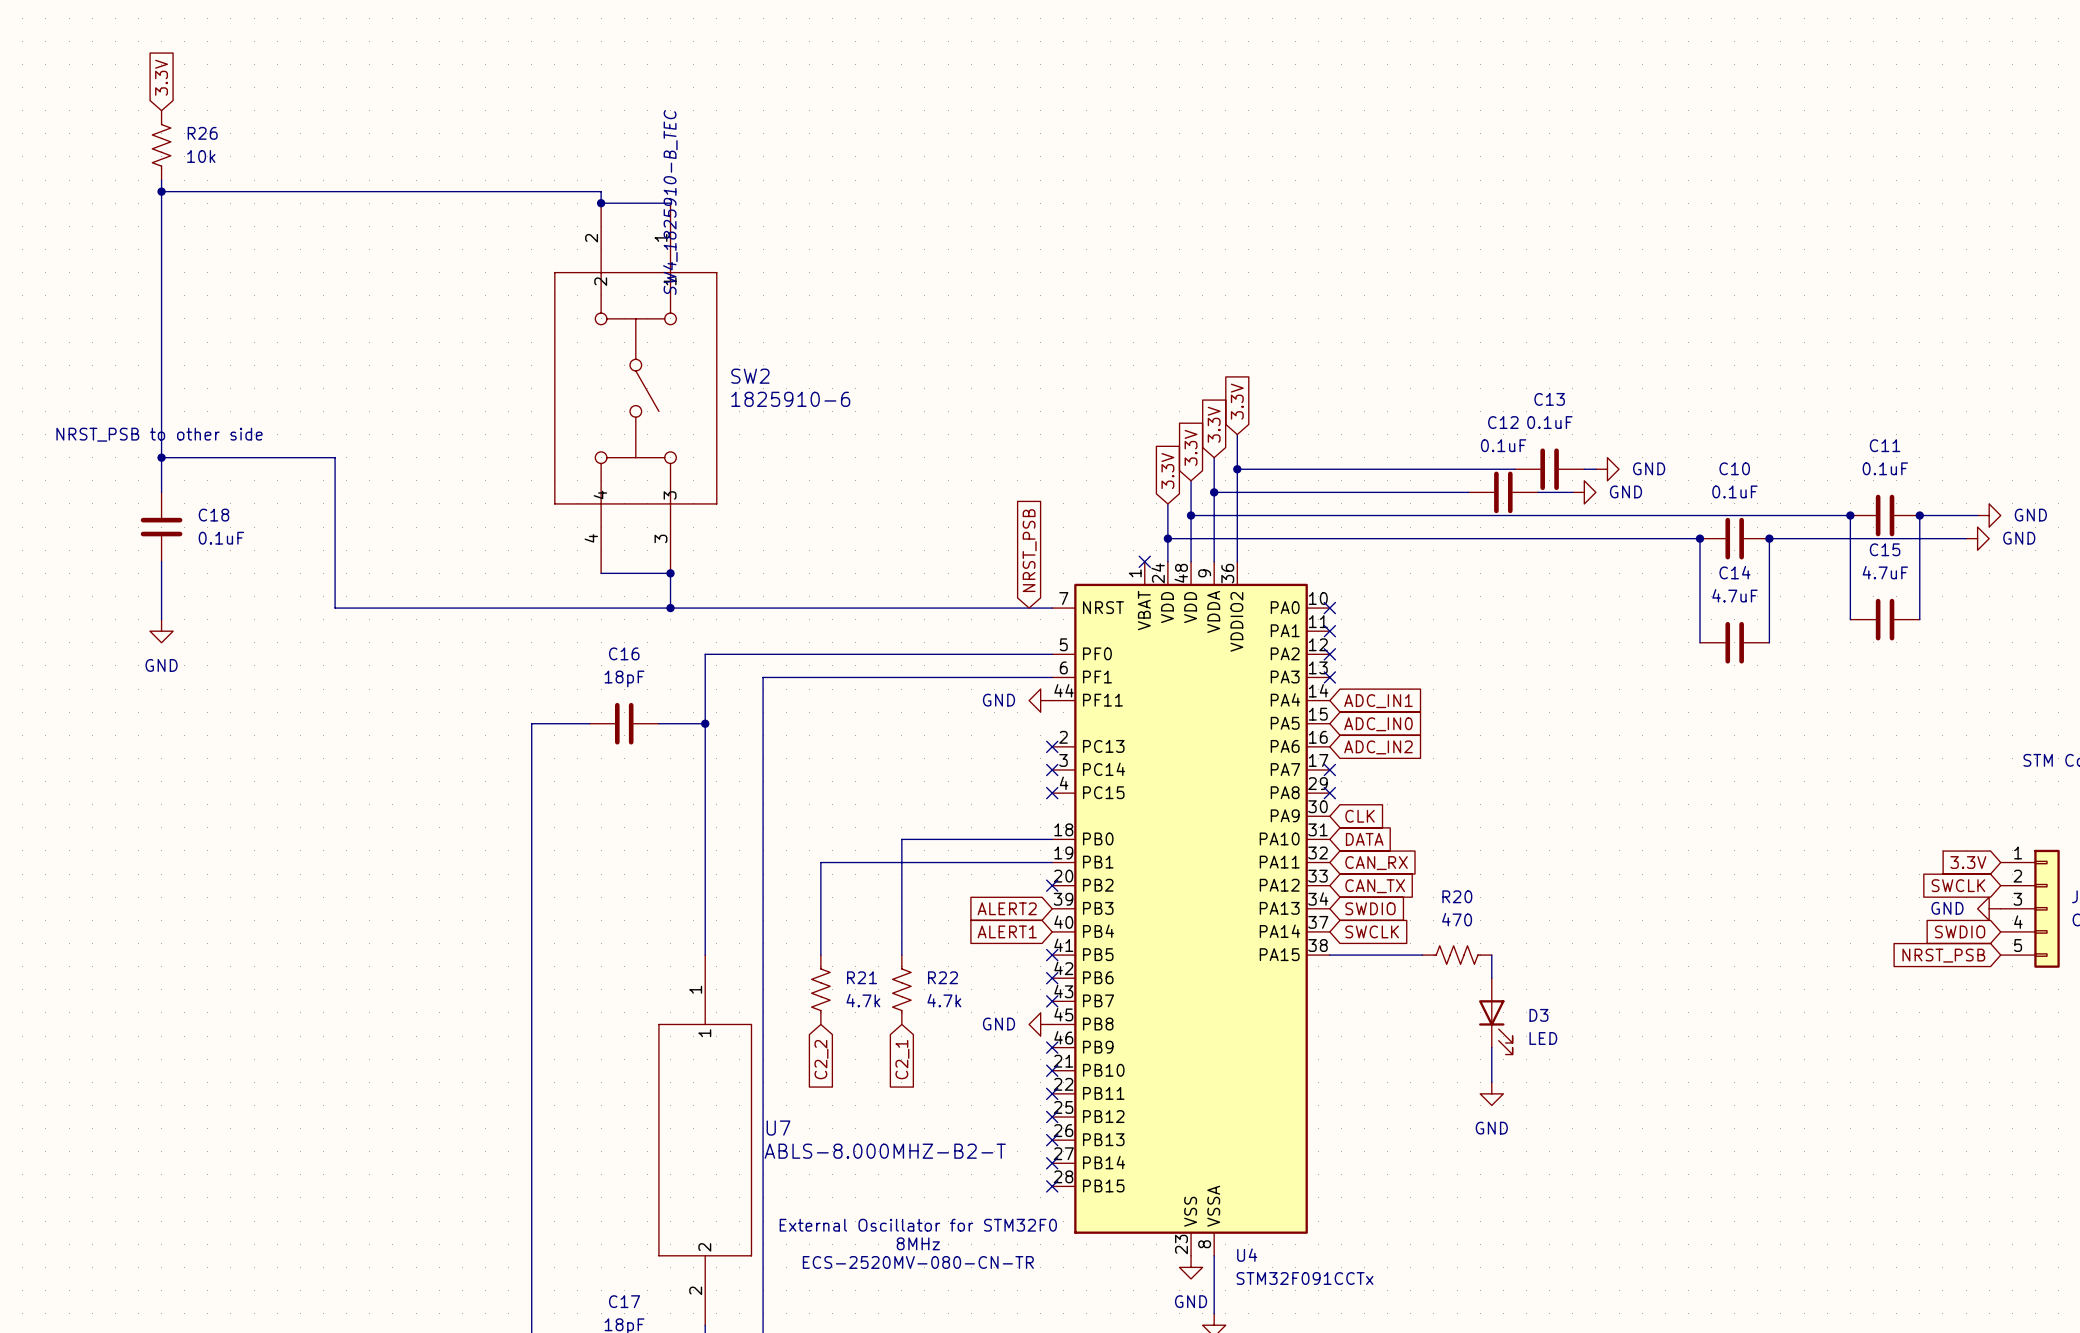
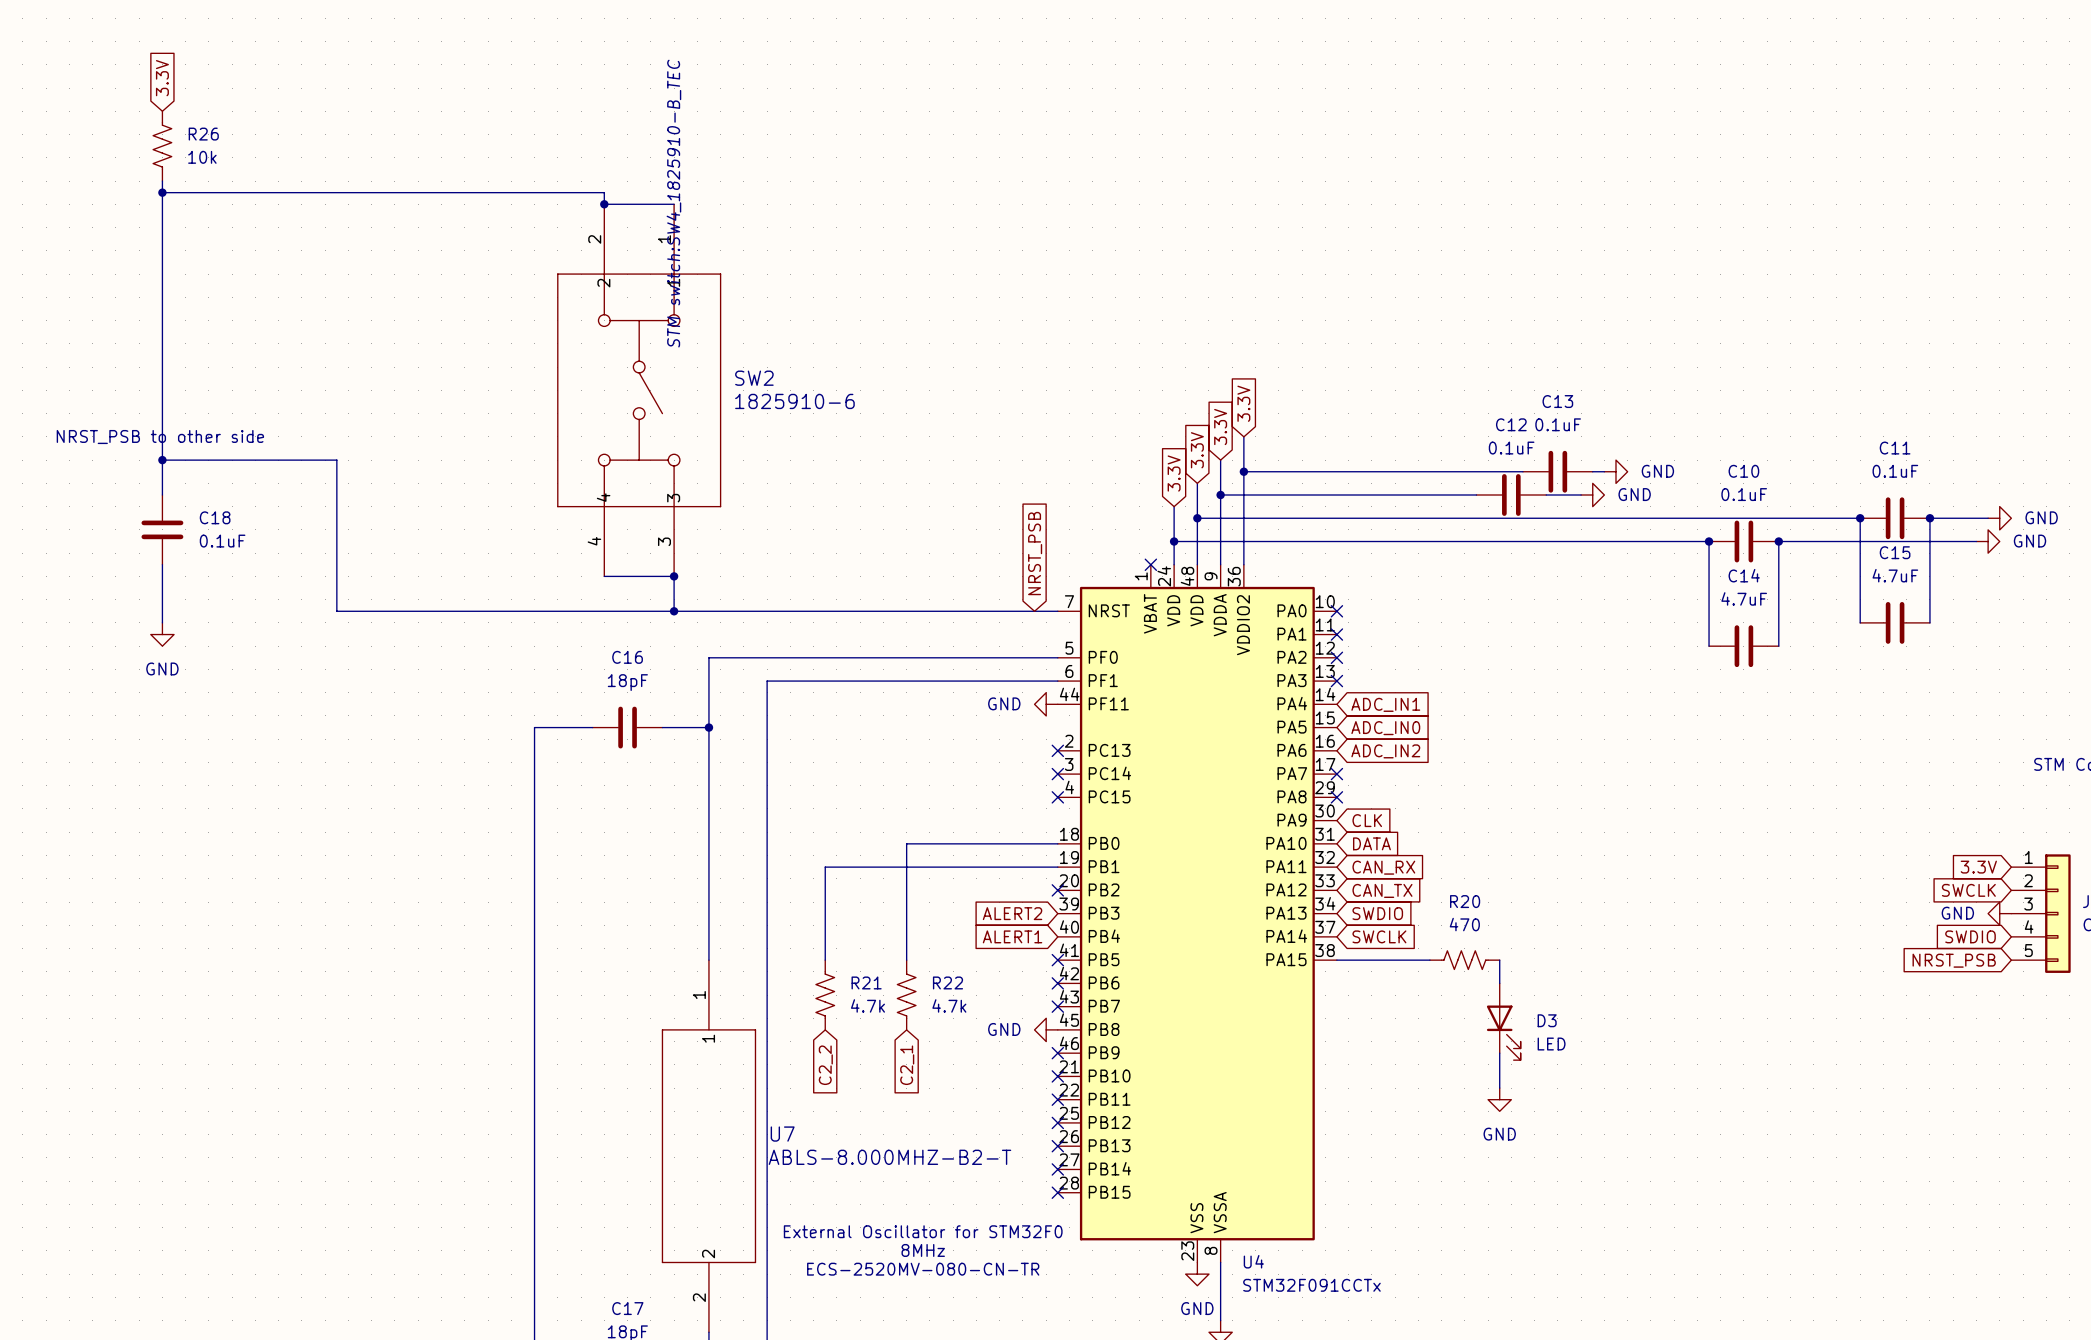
SW2 text: SW4_1825910-B_TEC (670, 202) -> STM switch:SW4_1825910-B_TEC (673, 203)

